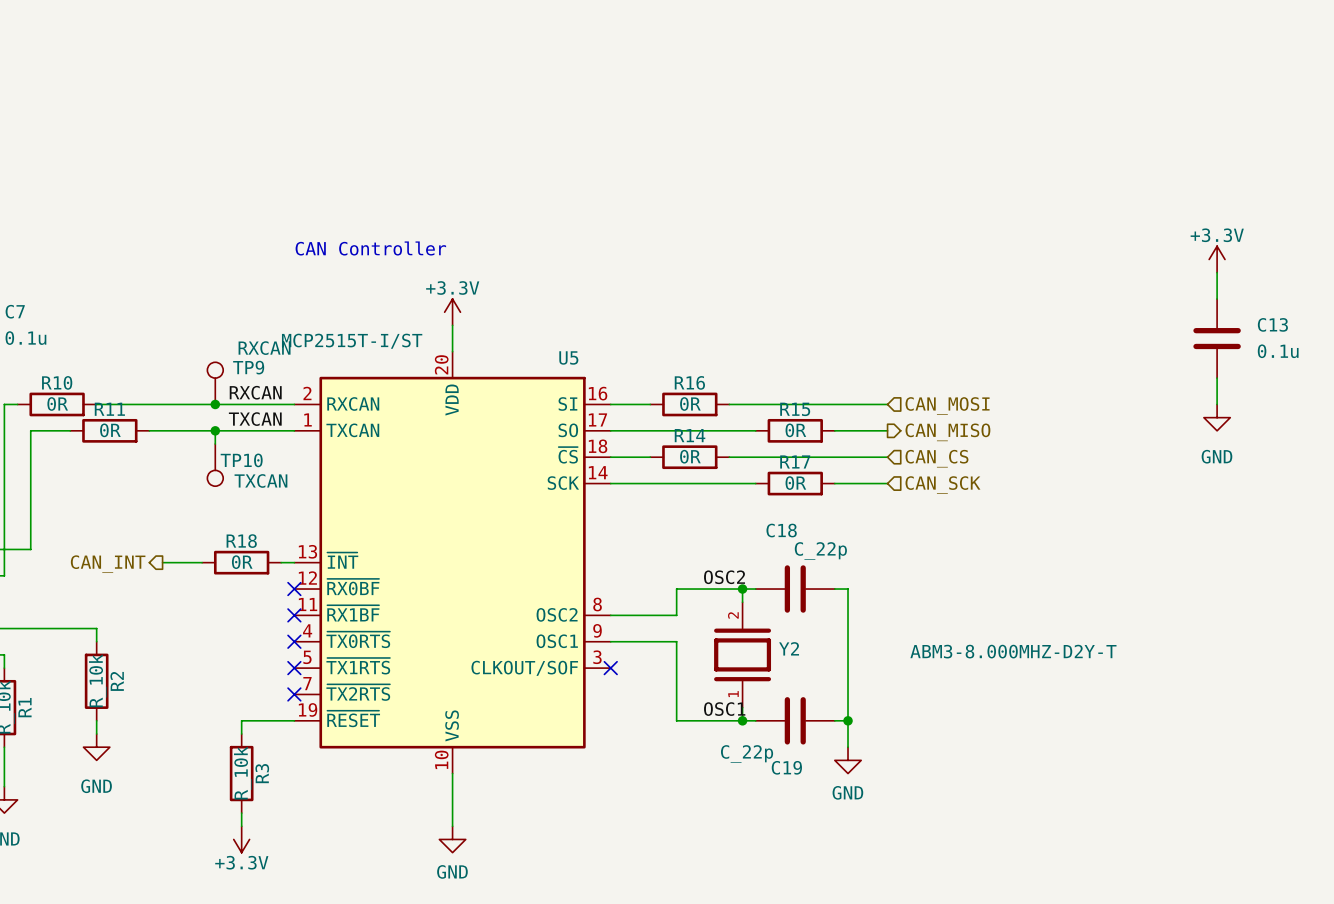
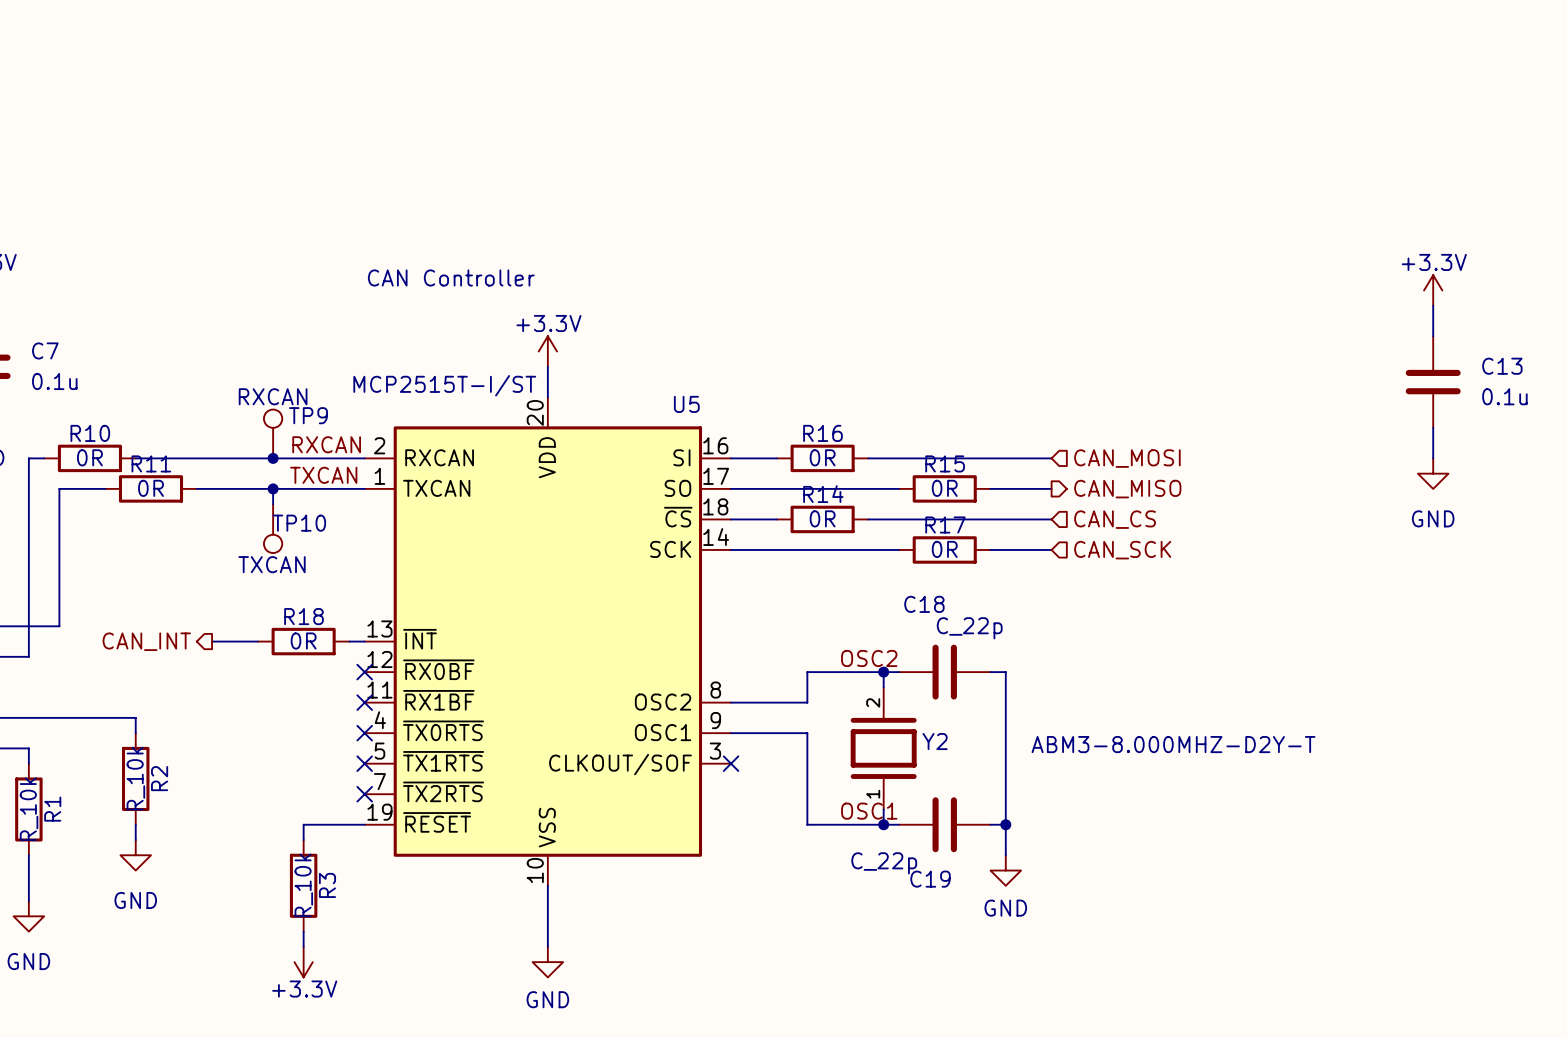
TP9 value position: RXCAN (264, 348) -> RXCAN (273, 396)
TP10 value position: TXCAN (260, 480) -> TXCAN (272, 564)

